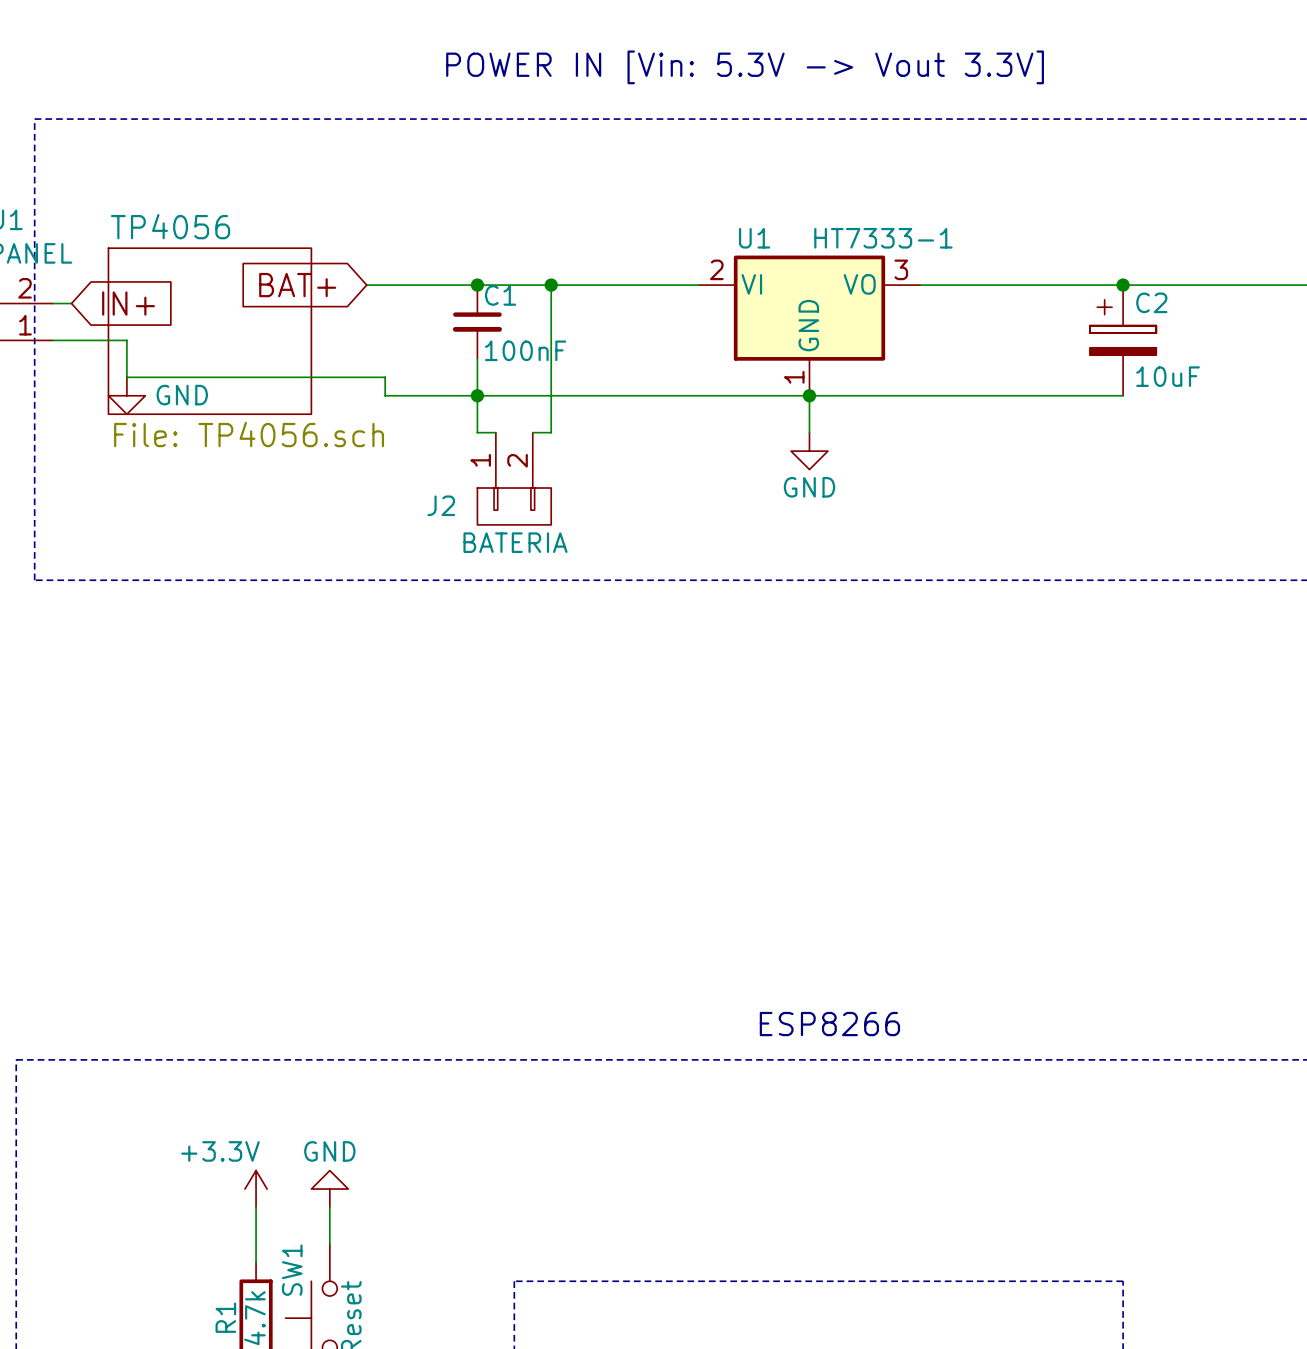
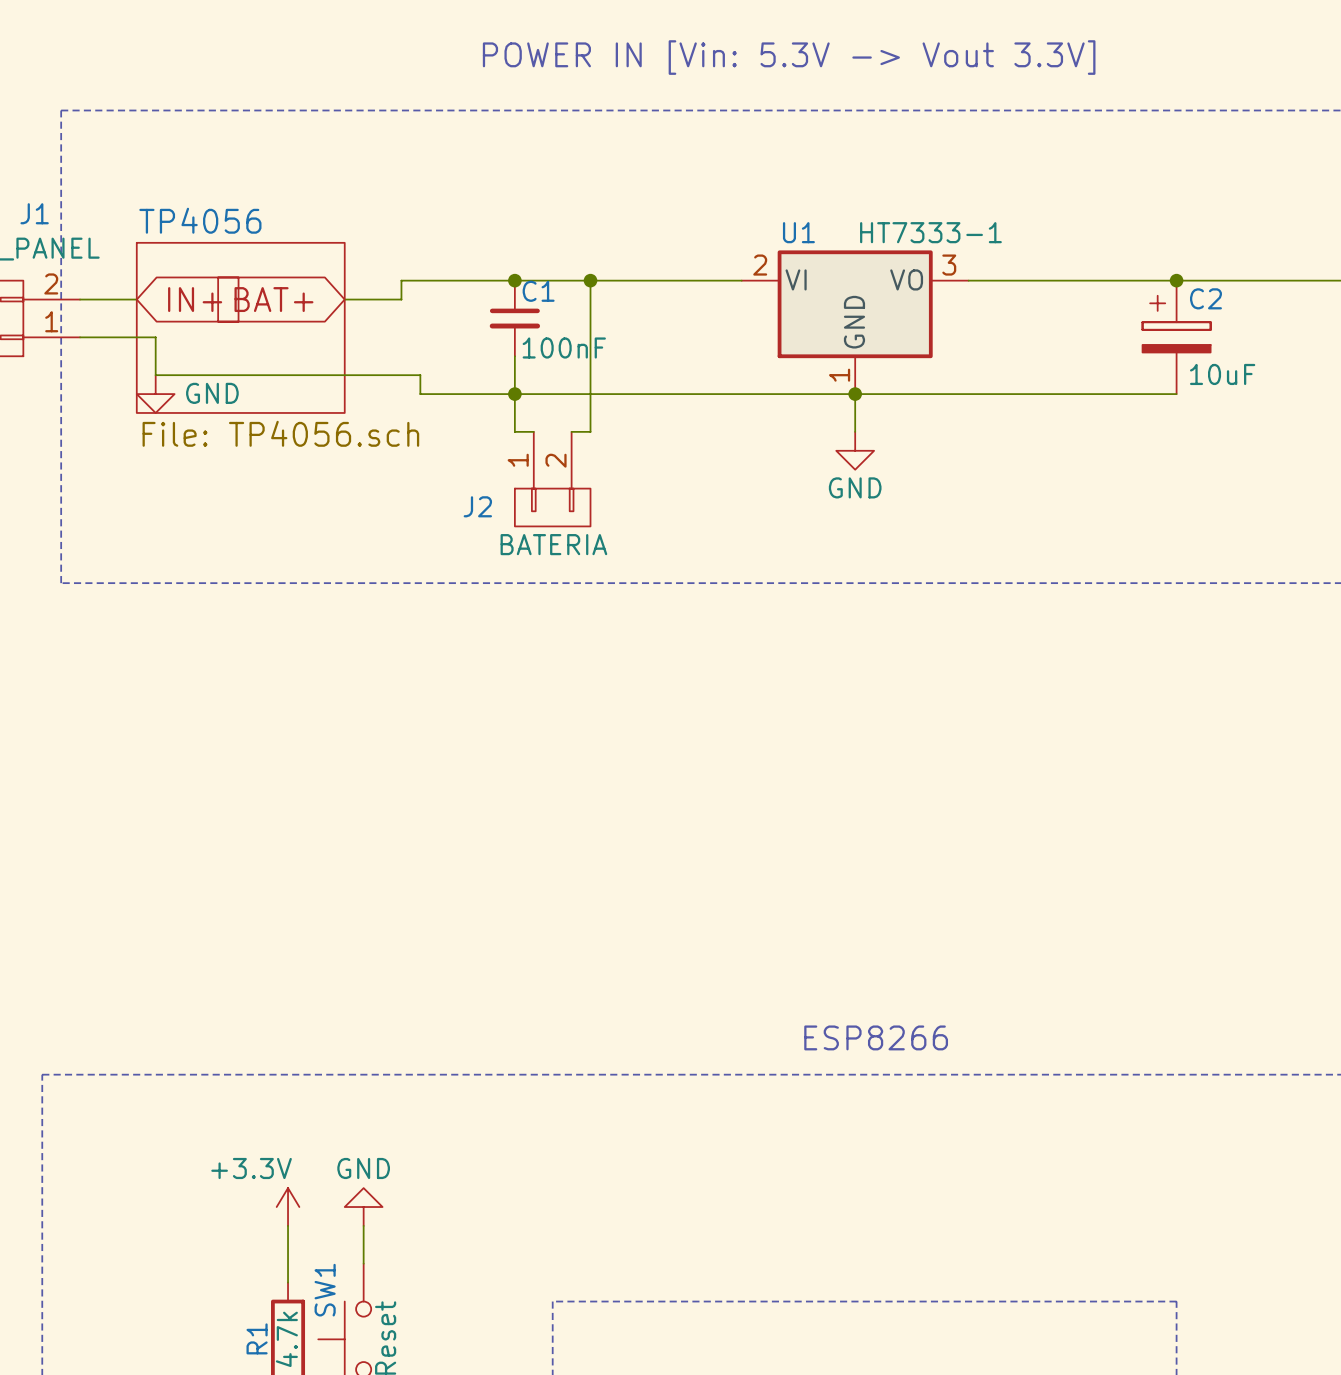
global label position: BAT+ (297, 285) -> BAT+ (273, 299)
wire: none -> (401, 280) (401, 299) (344, 299)
wire: none -> (98, 299) (136, 299)
global label position: IN+ (128, 303) -> IN+ (195, 299)

